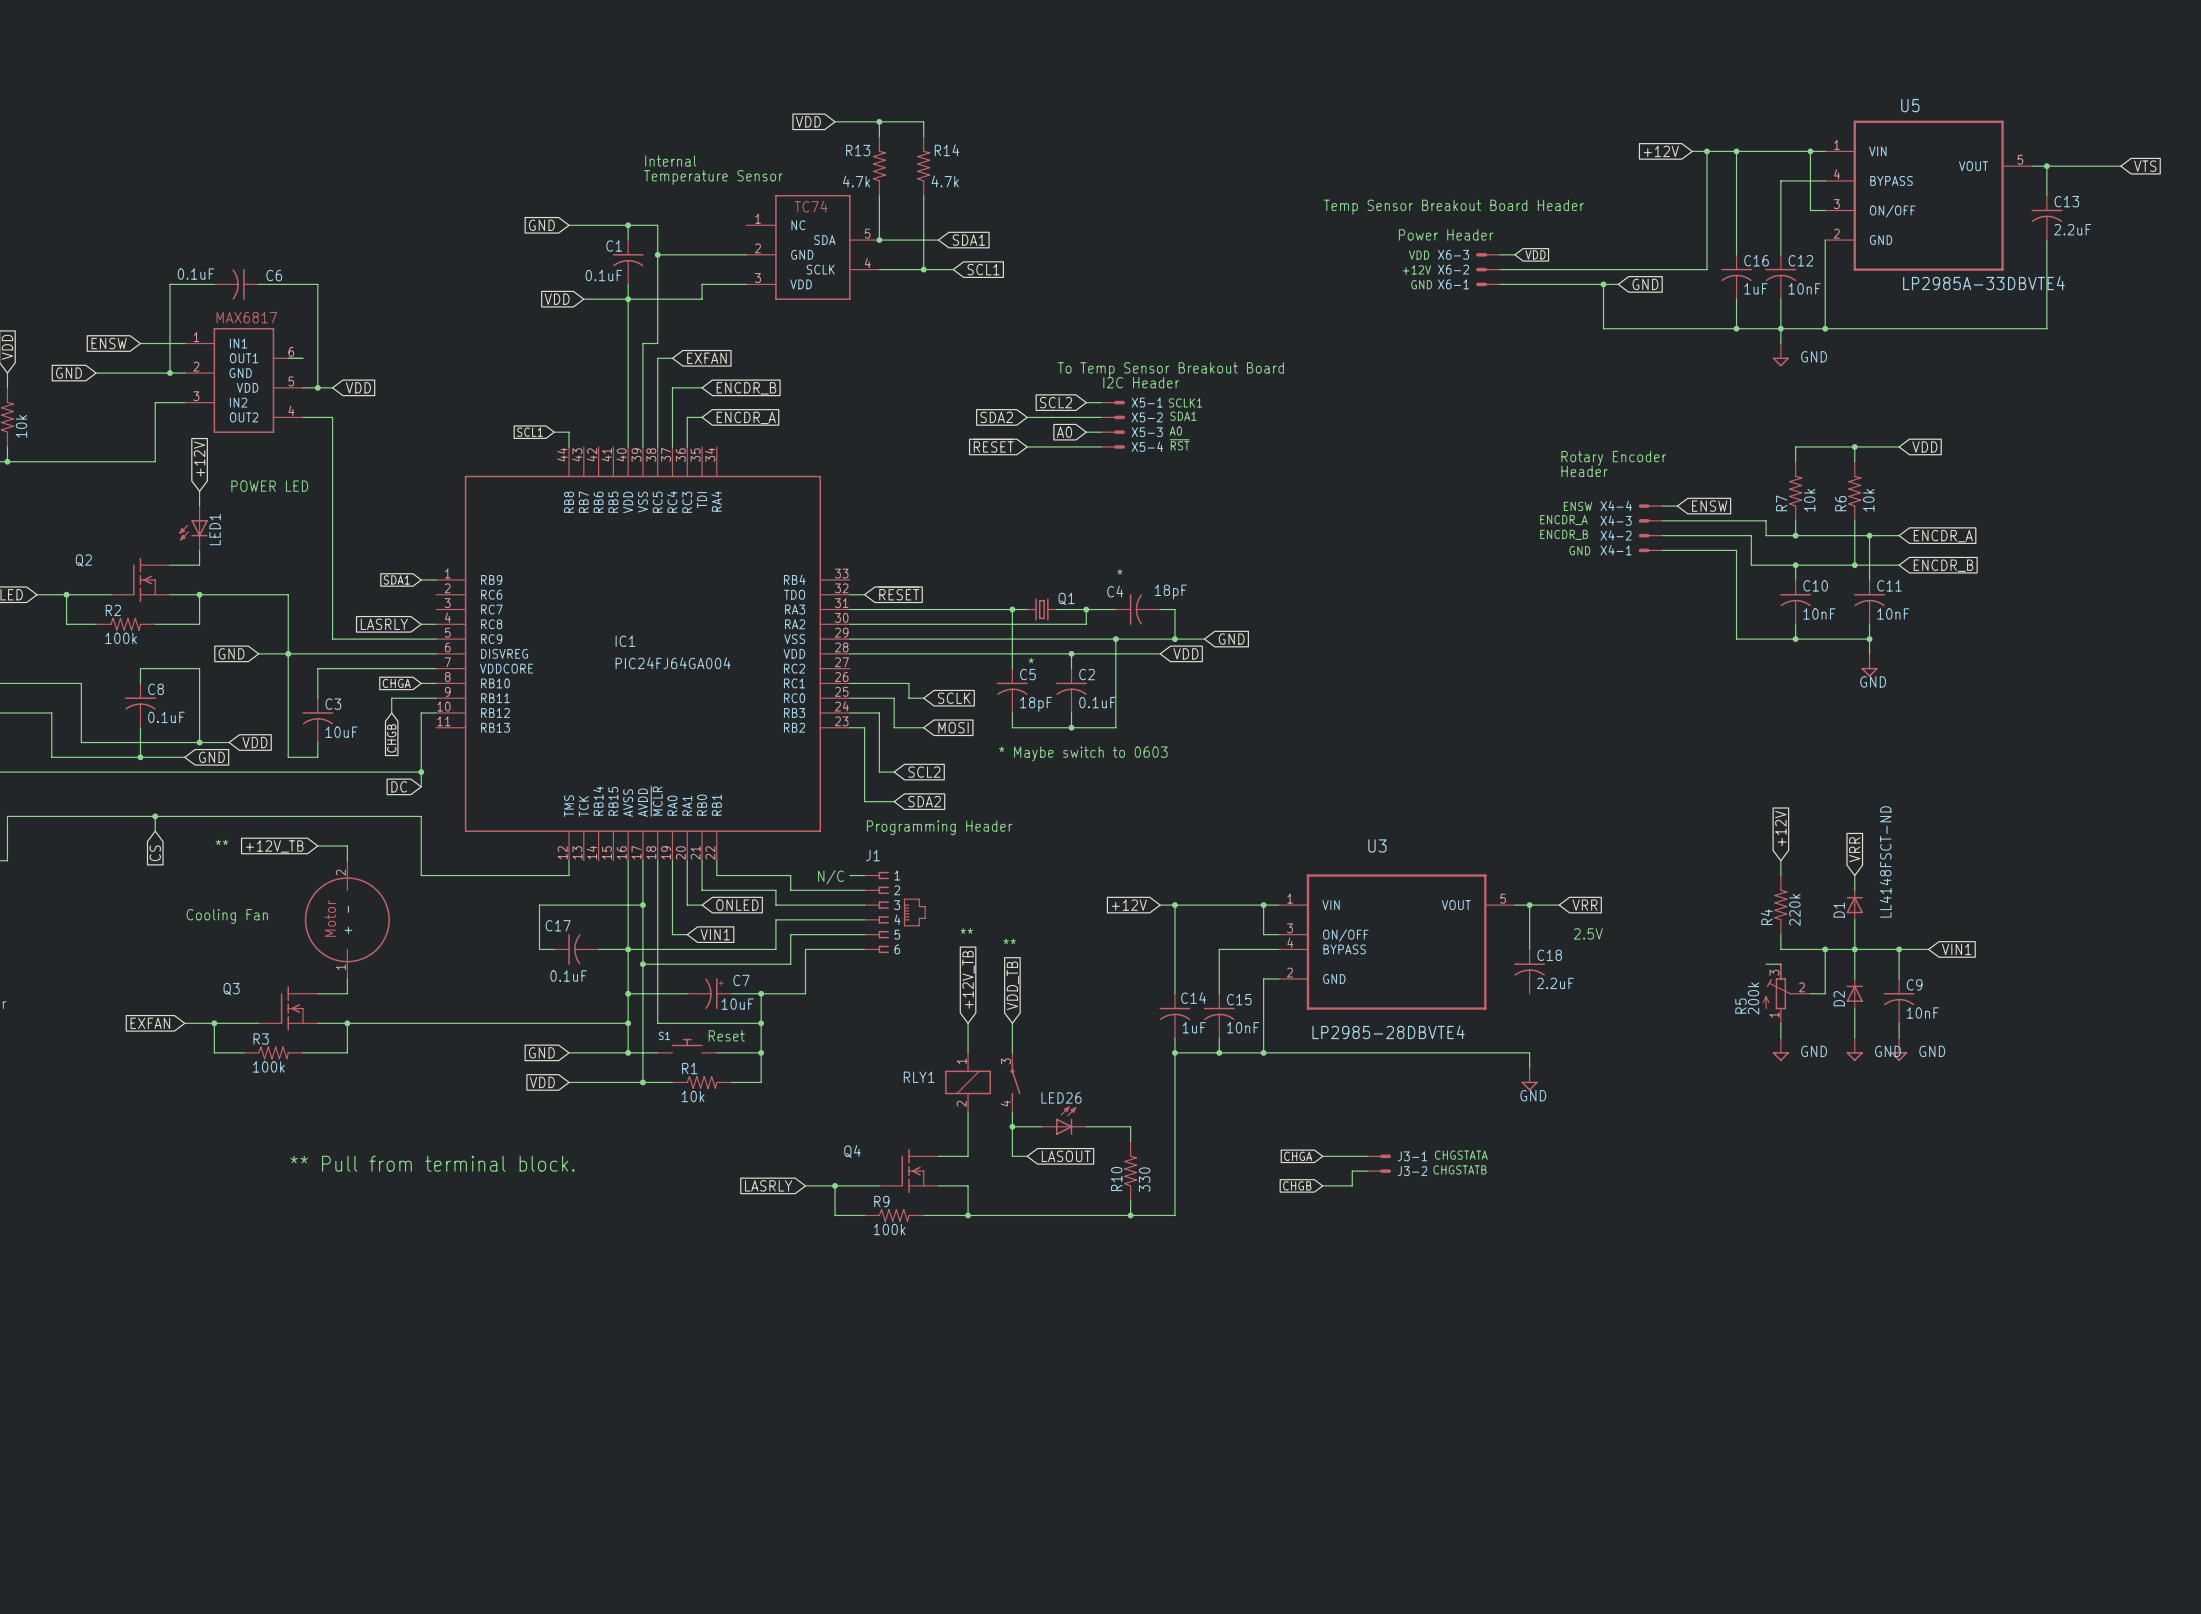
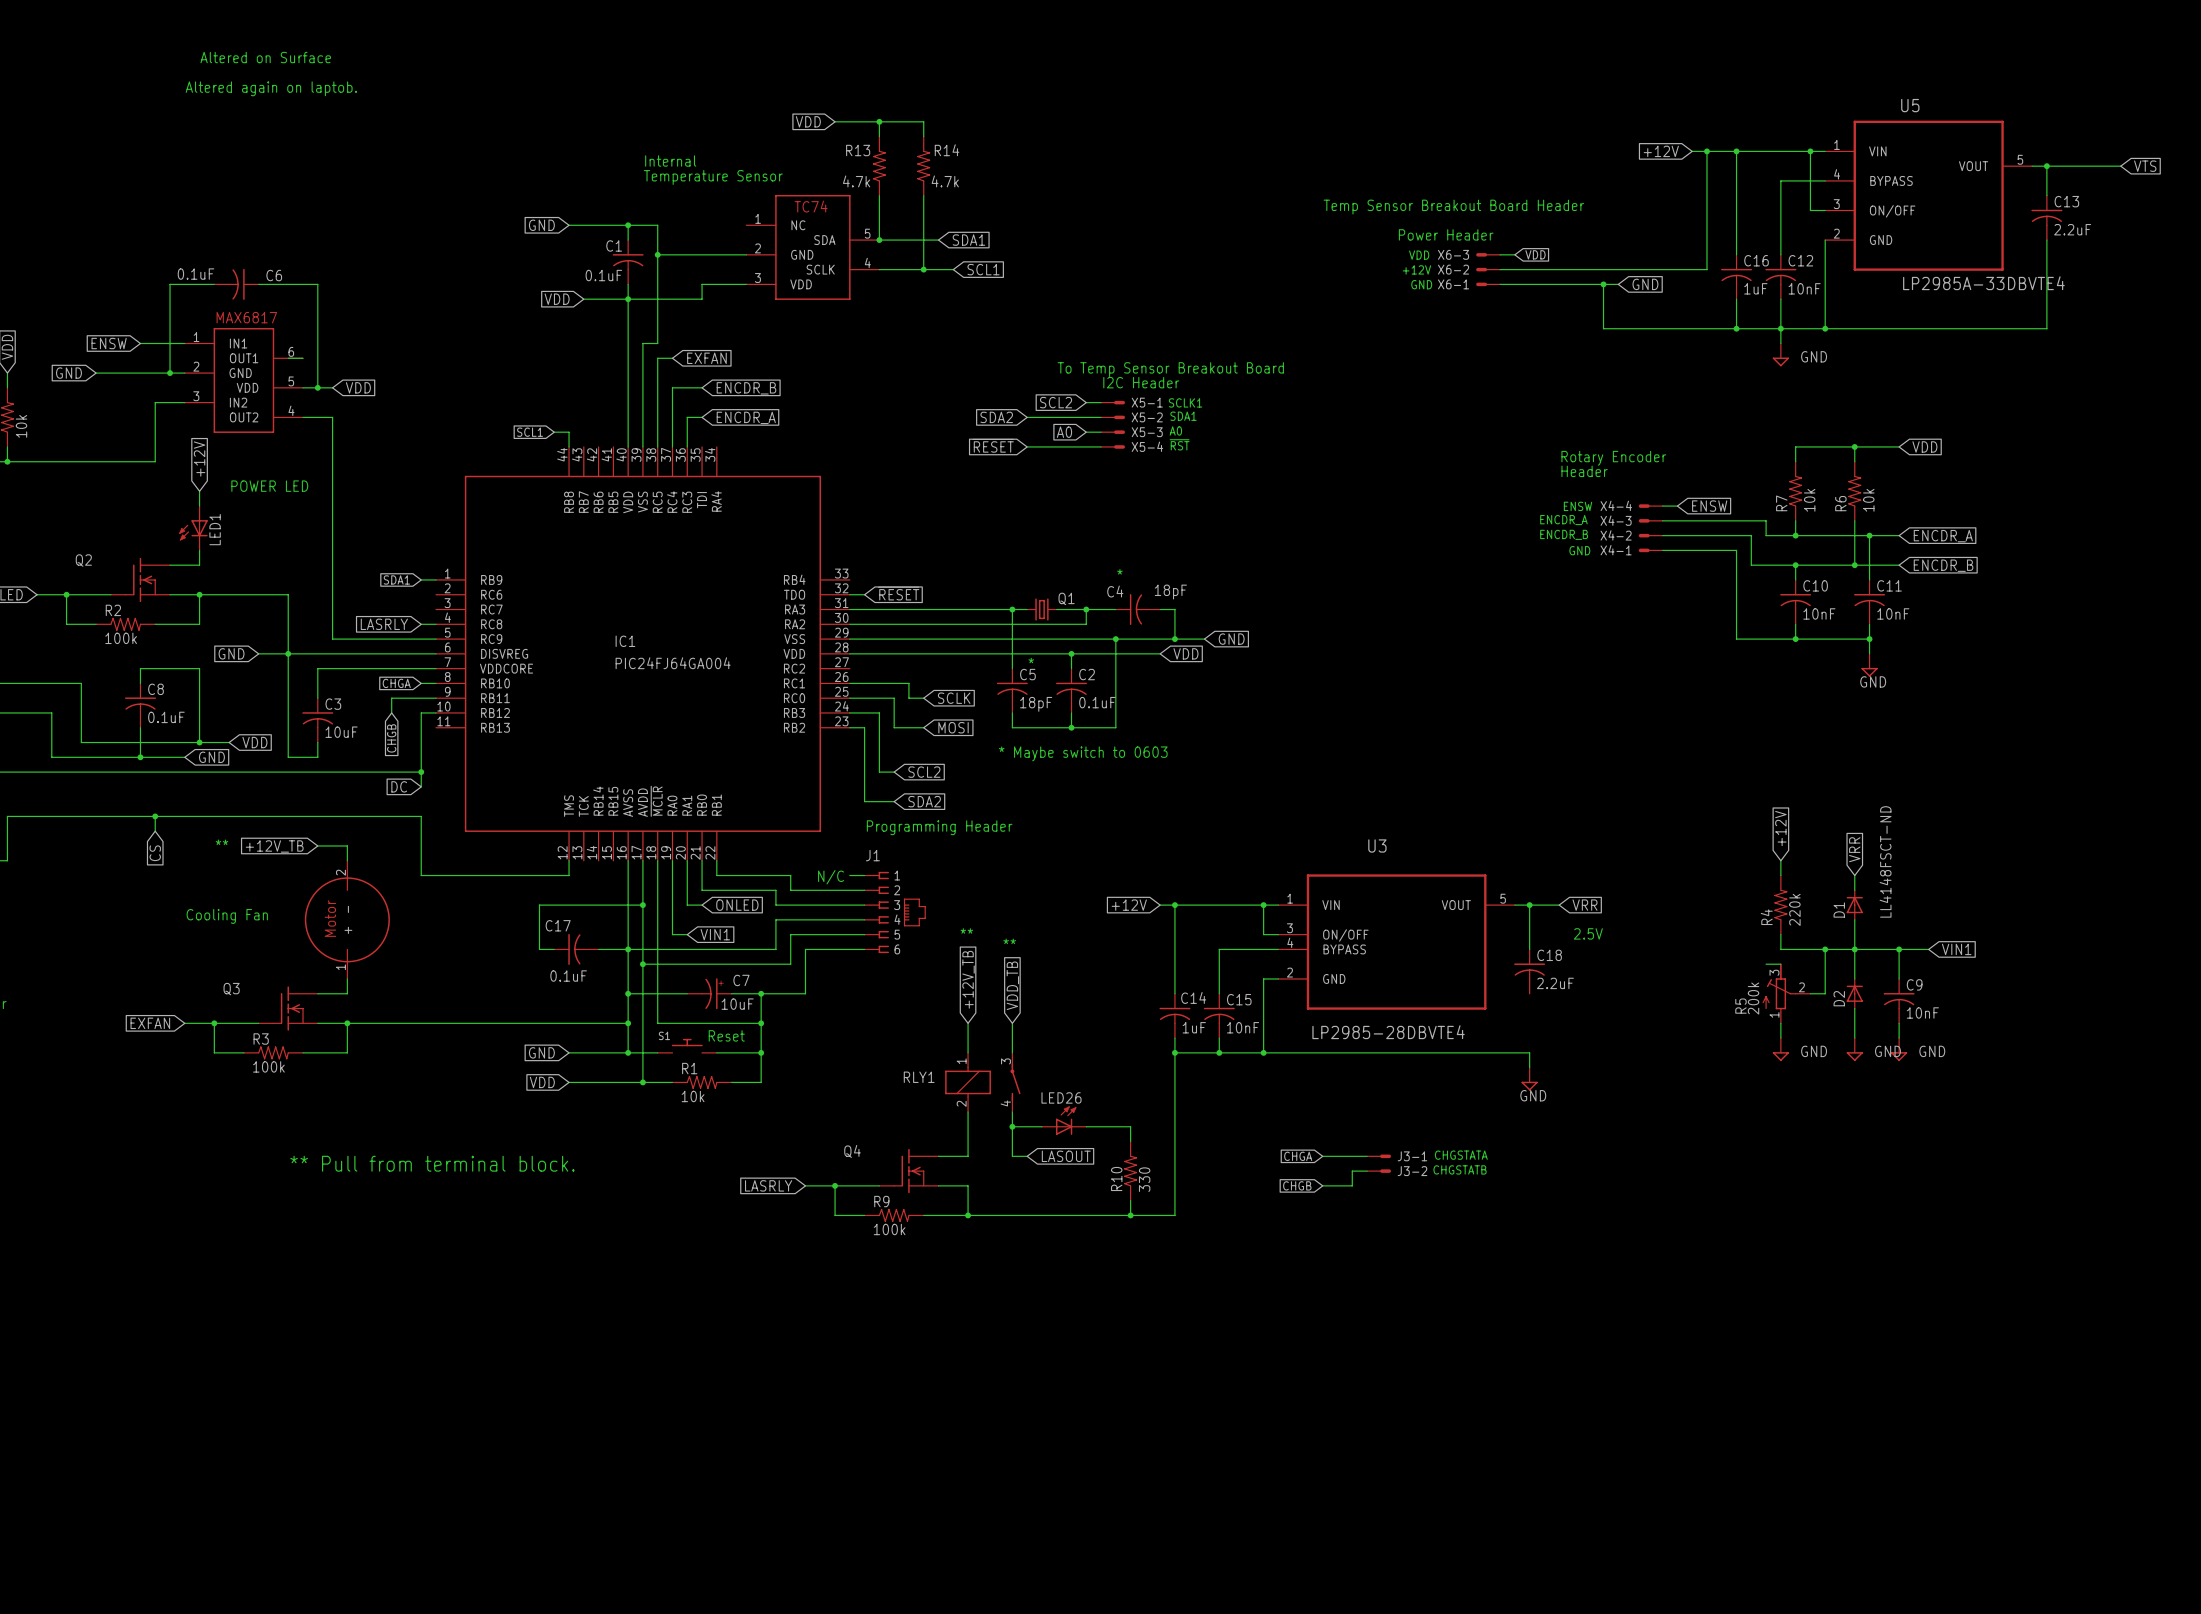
text: none -> Altered on Surface (265, 57)
text: none -> Altered again on laptob. (271, 88)

